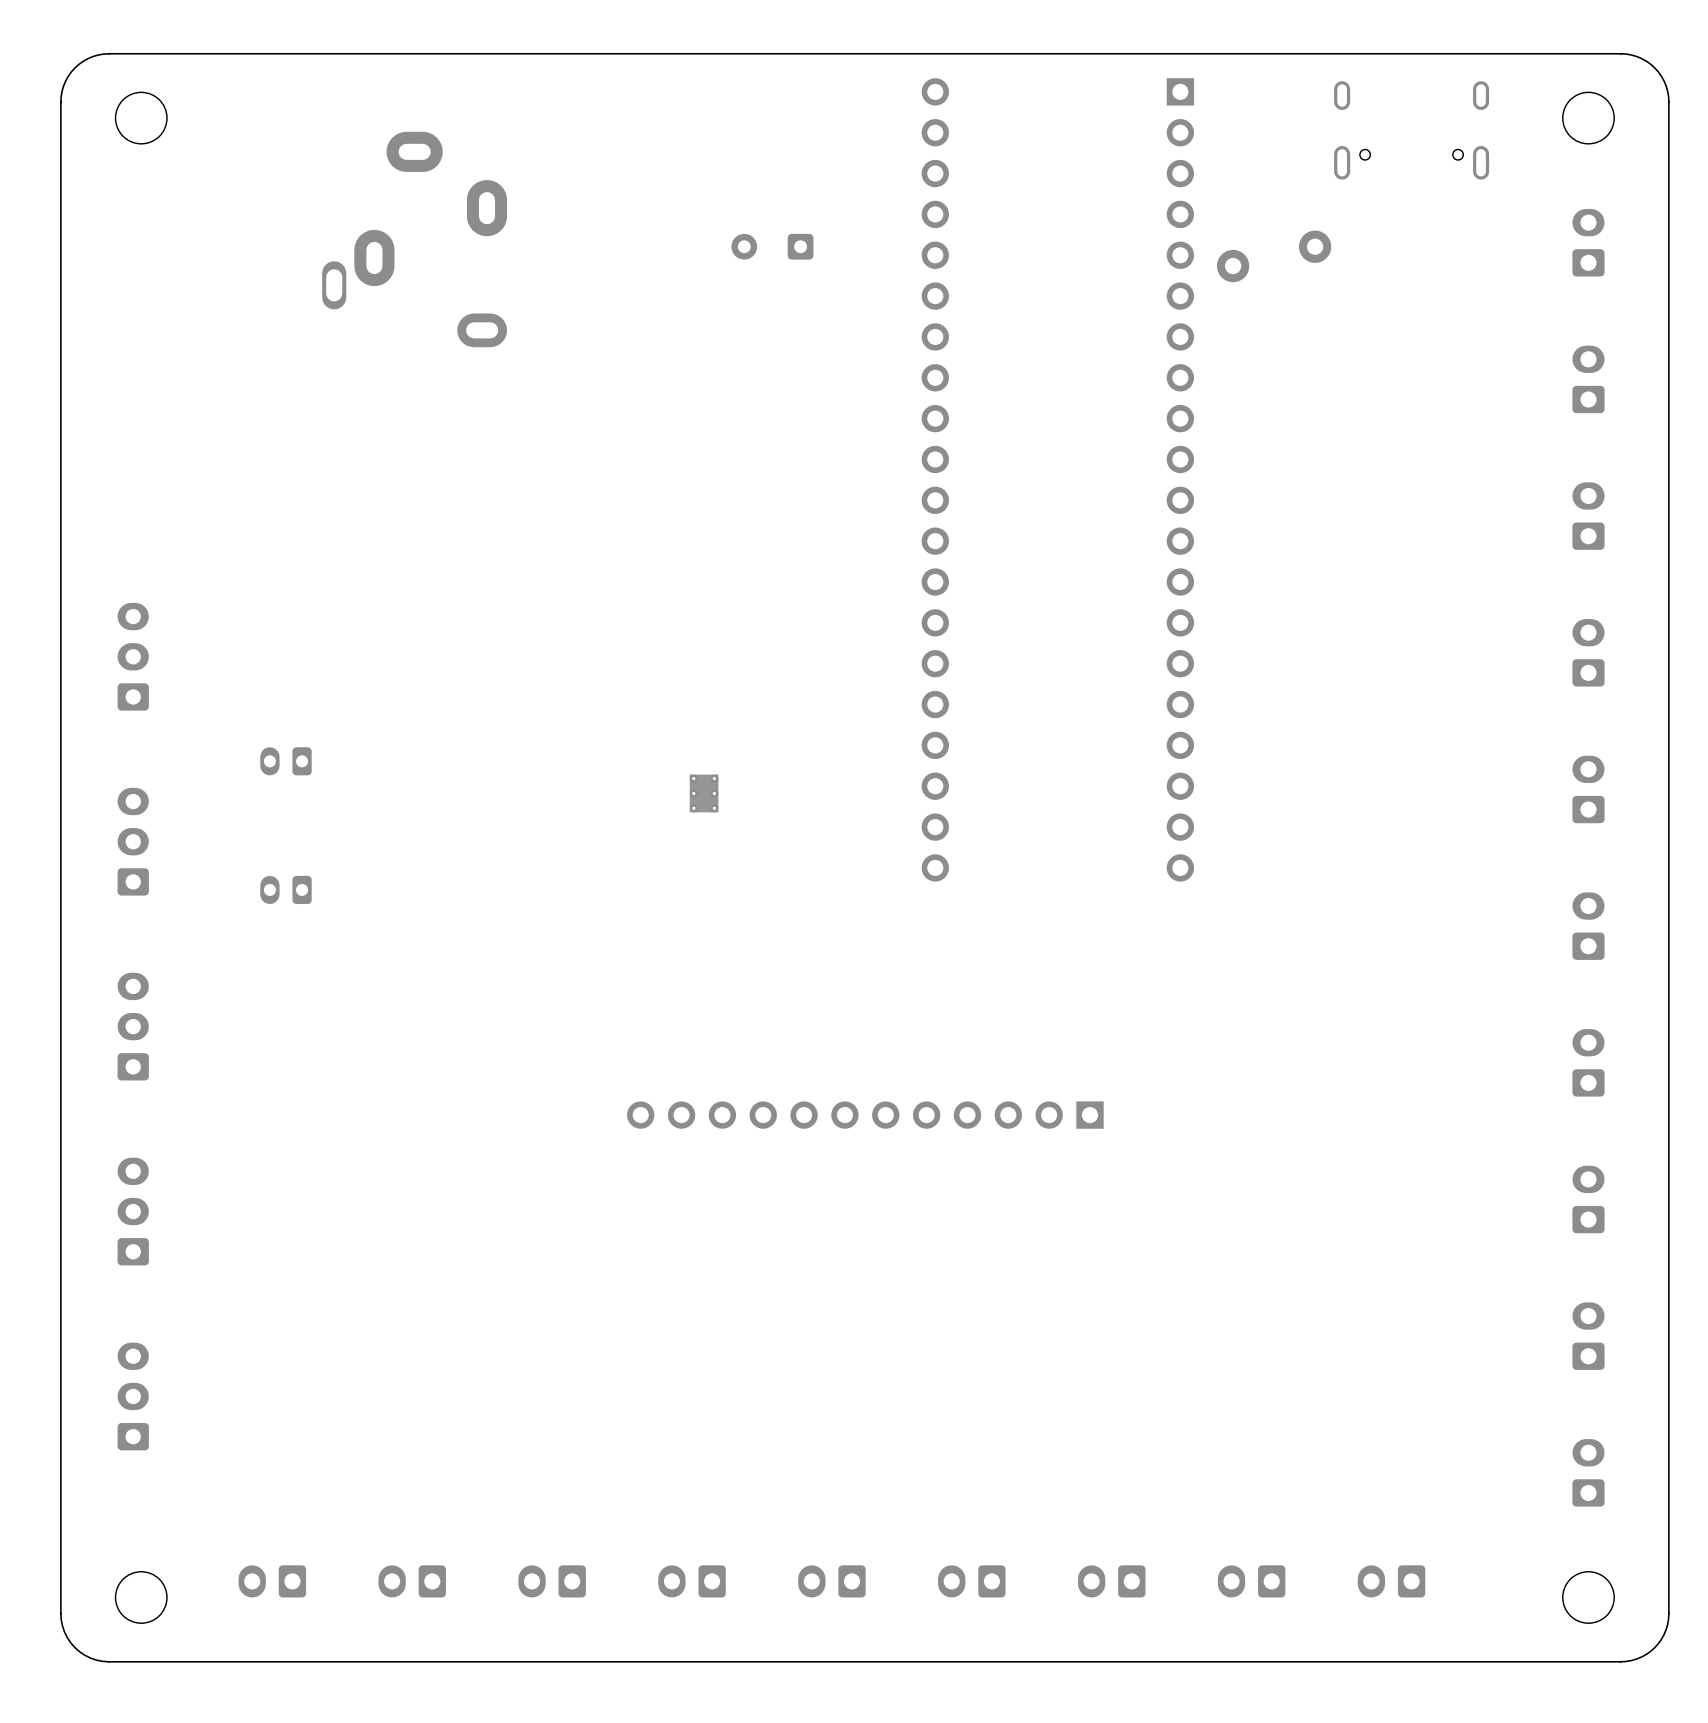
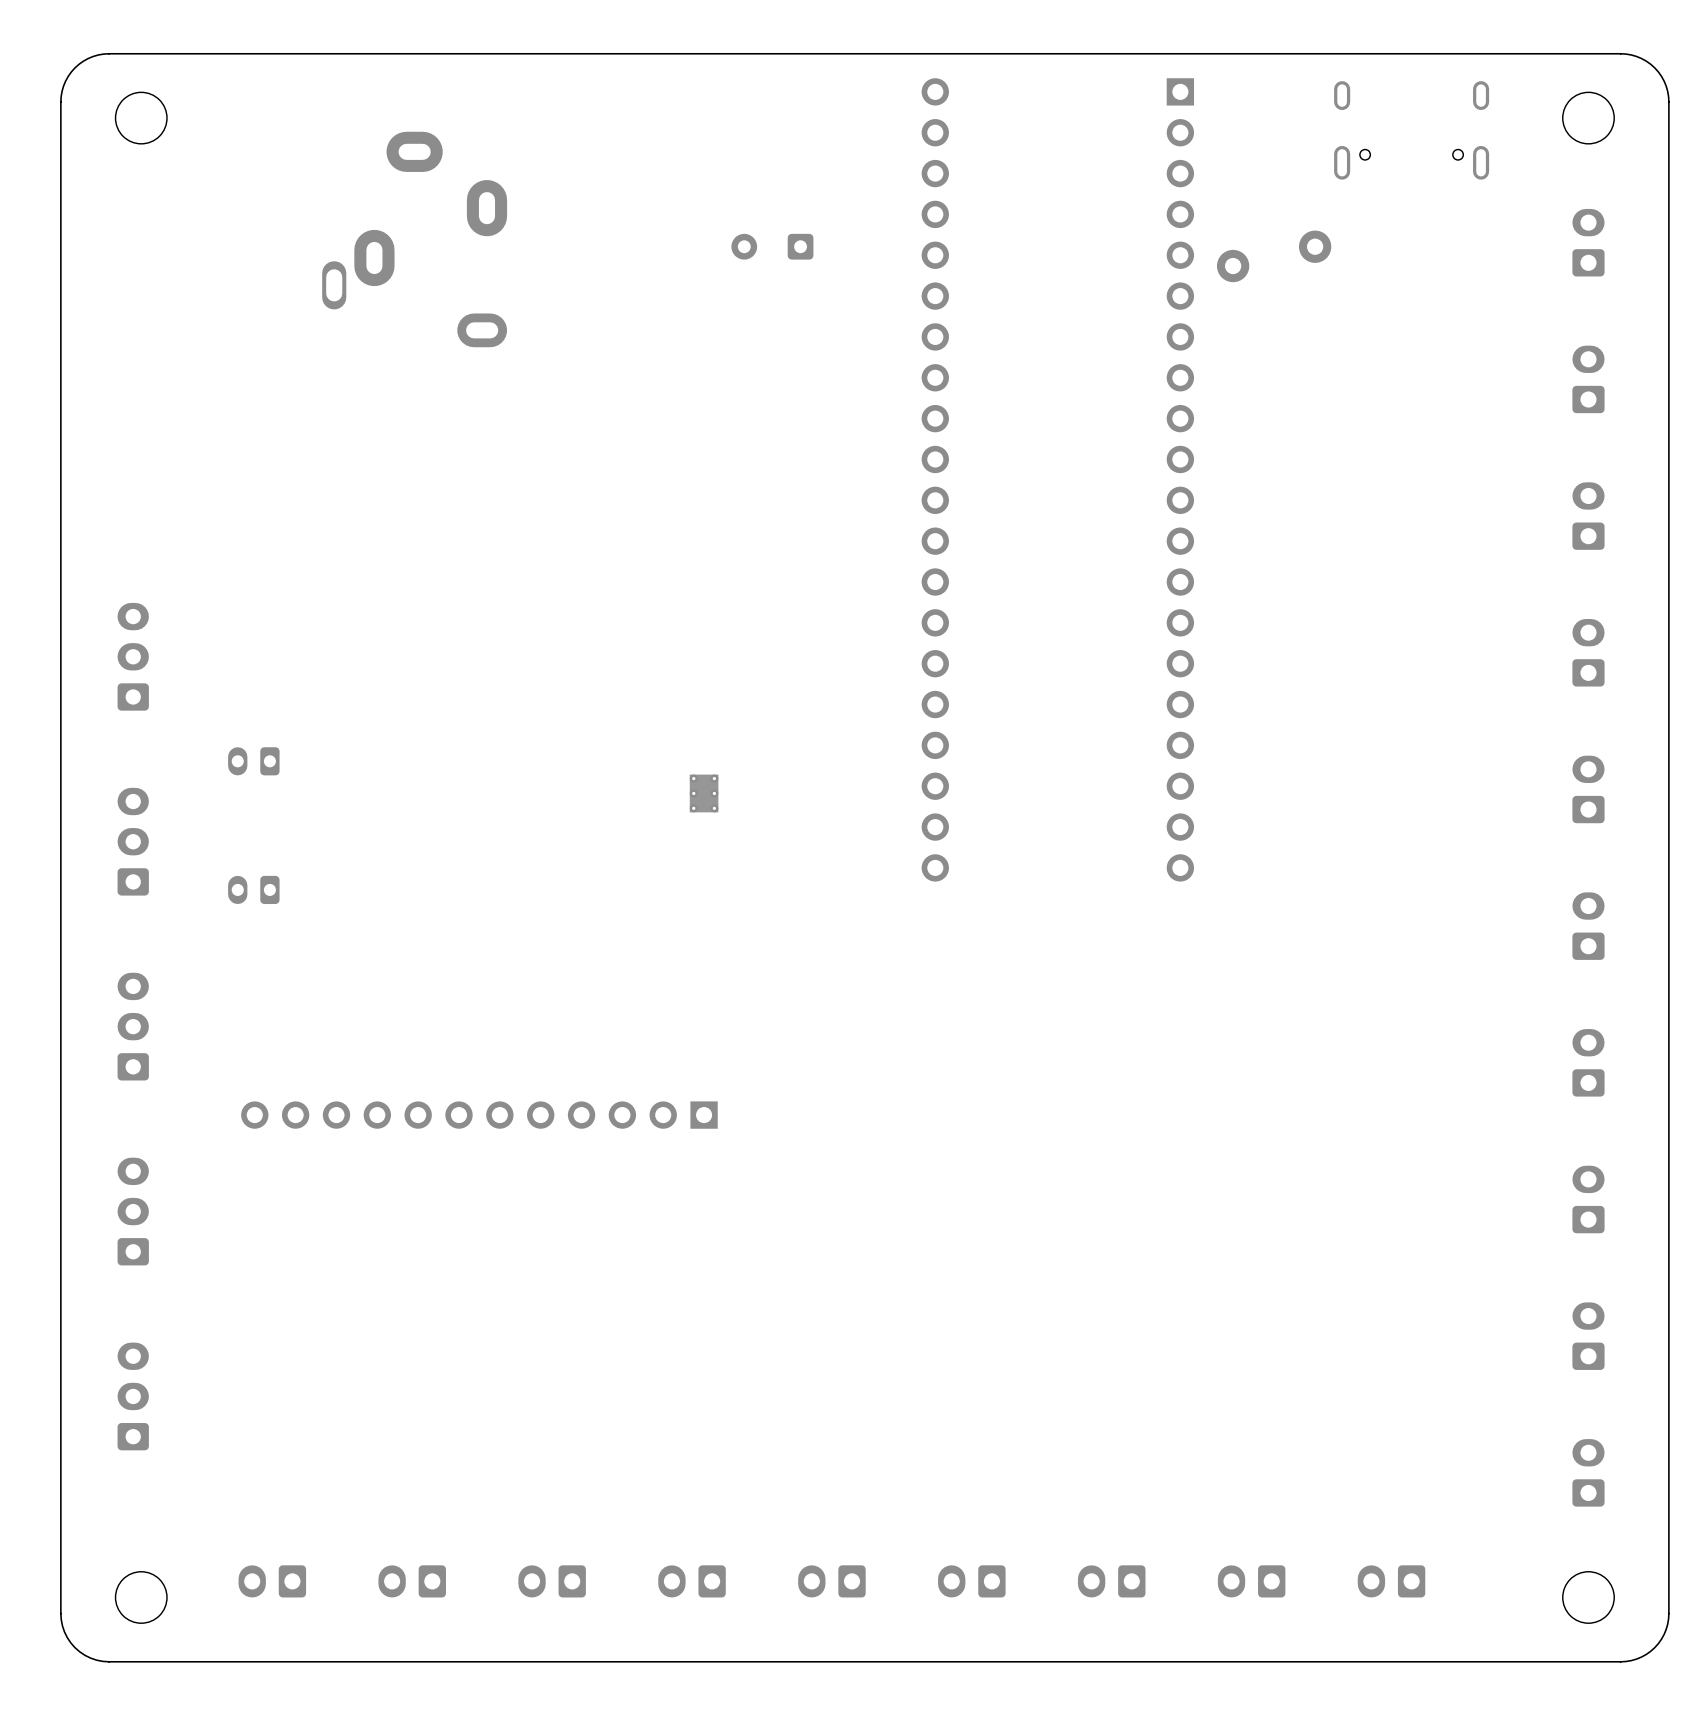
part position: (285, 761) -> (253, 761)
part position: (285, 889) -> (253, 889)
part position: (865, 1115) -> (479, 1115)

